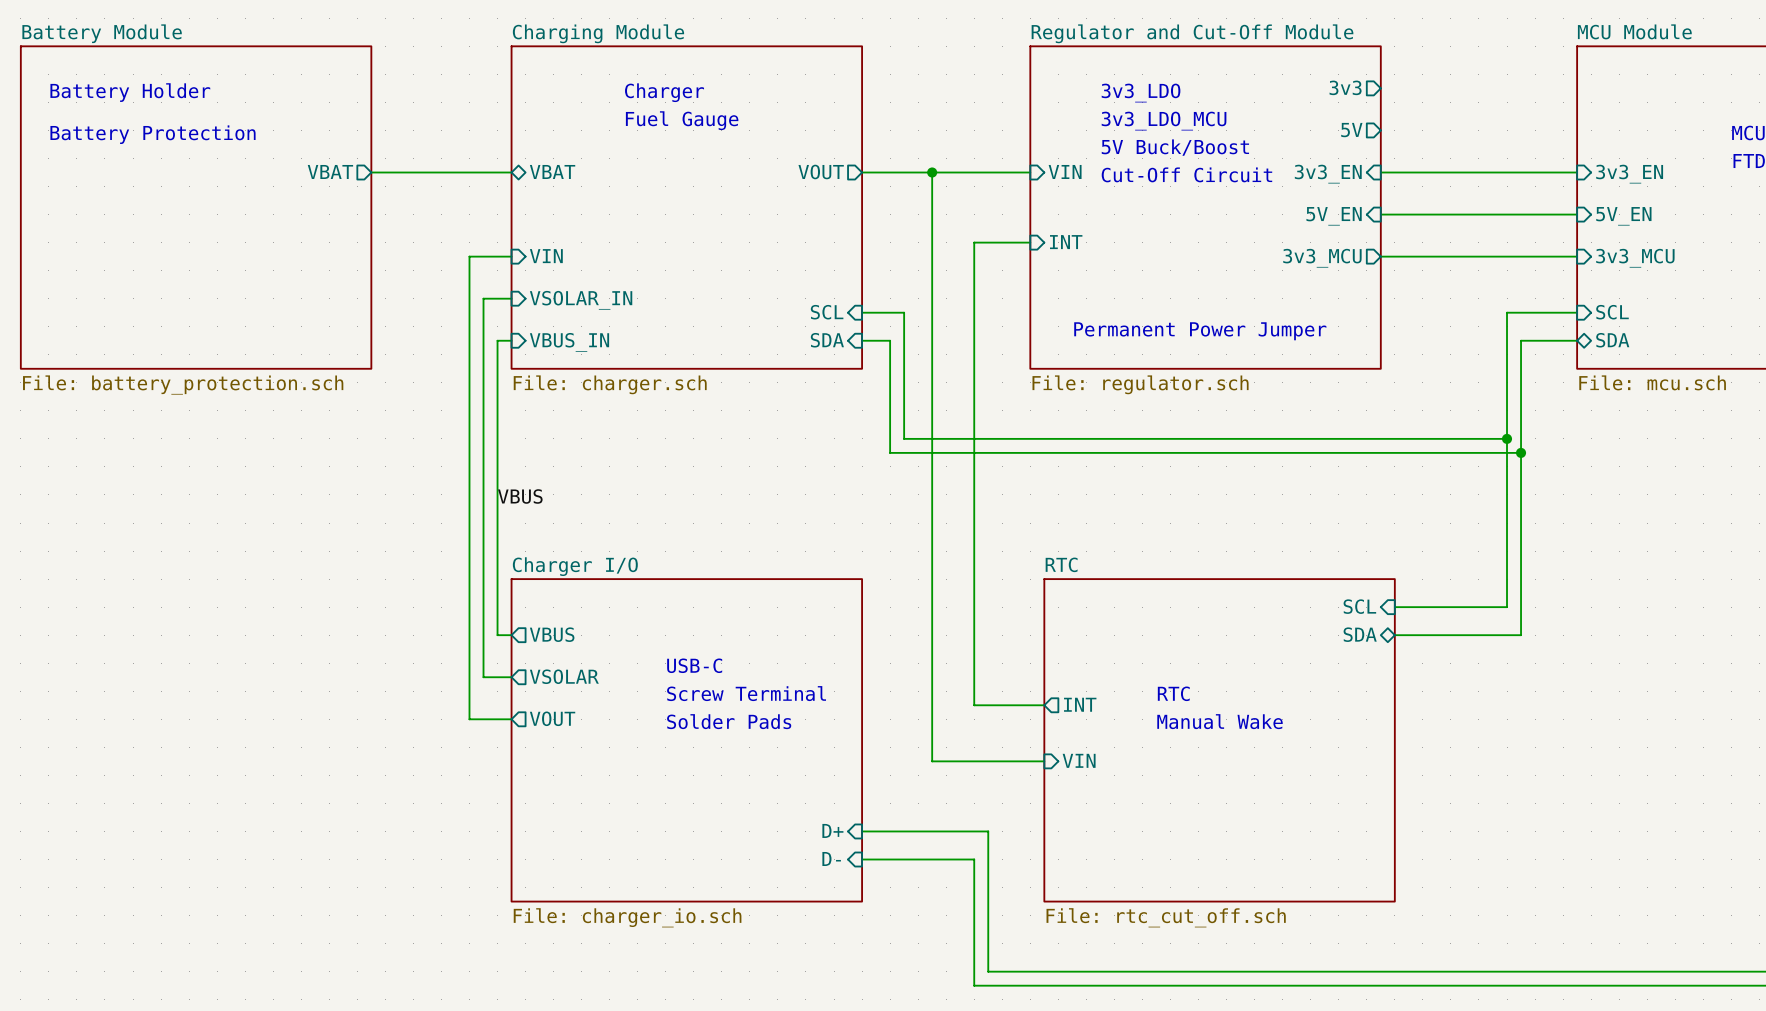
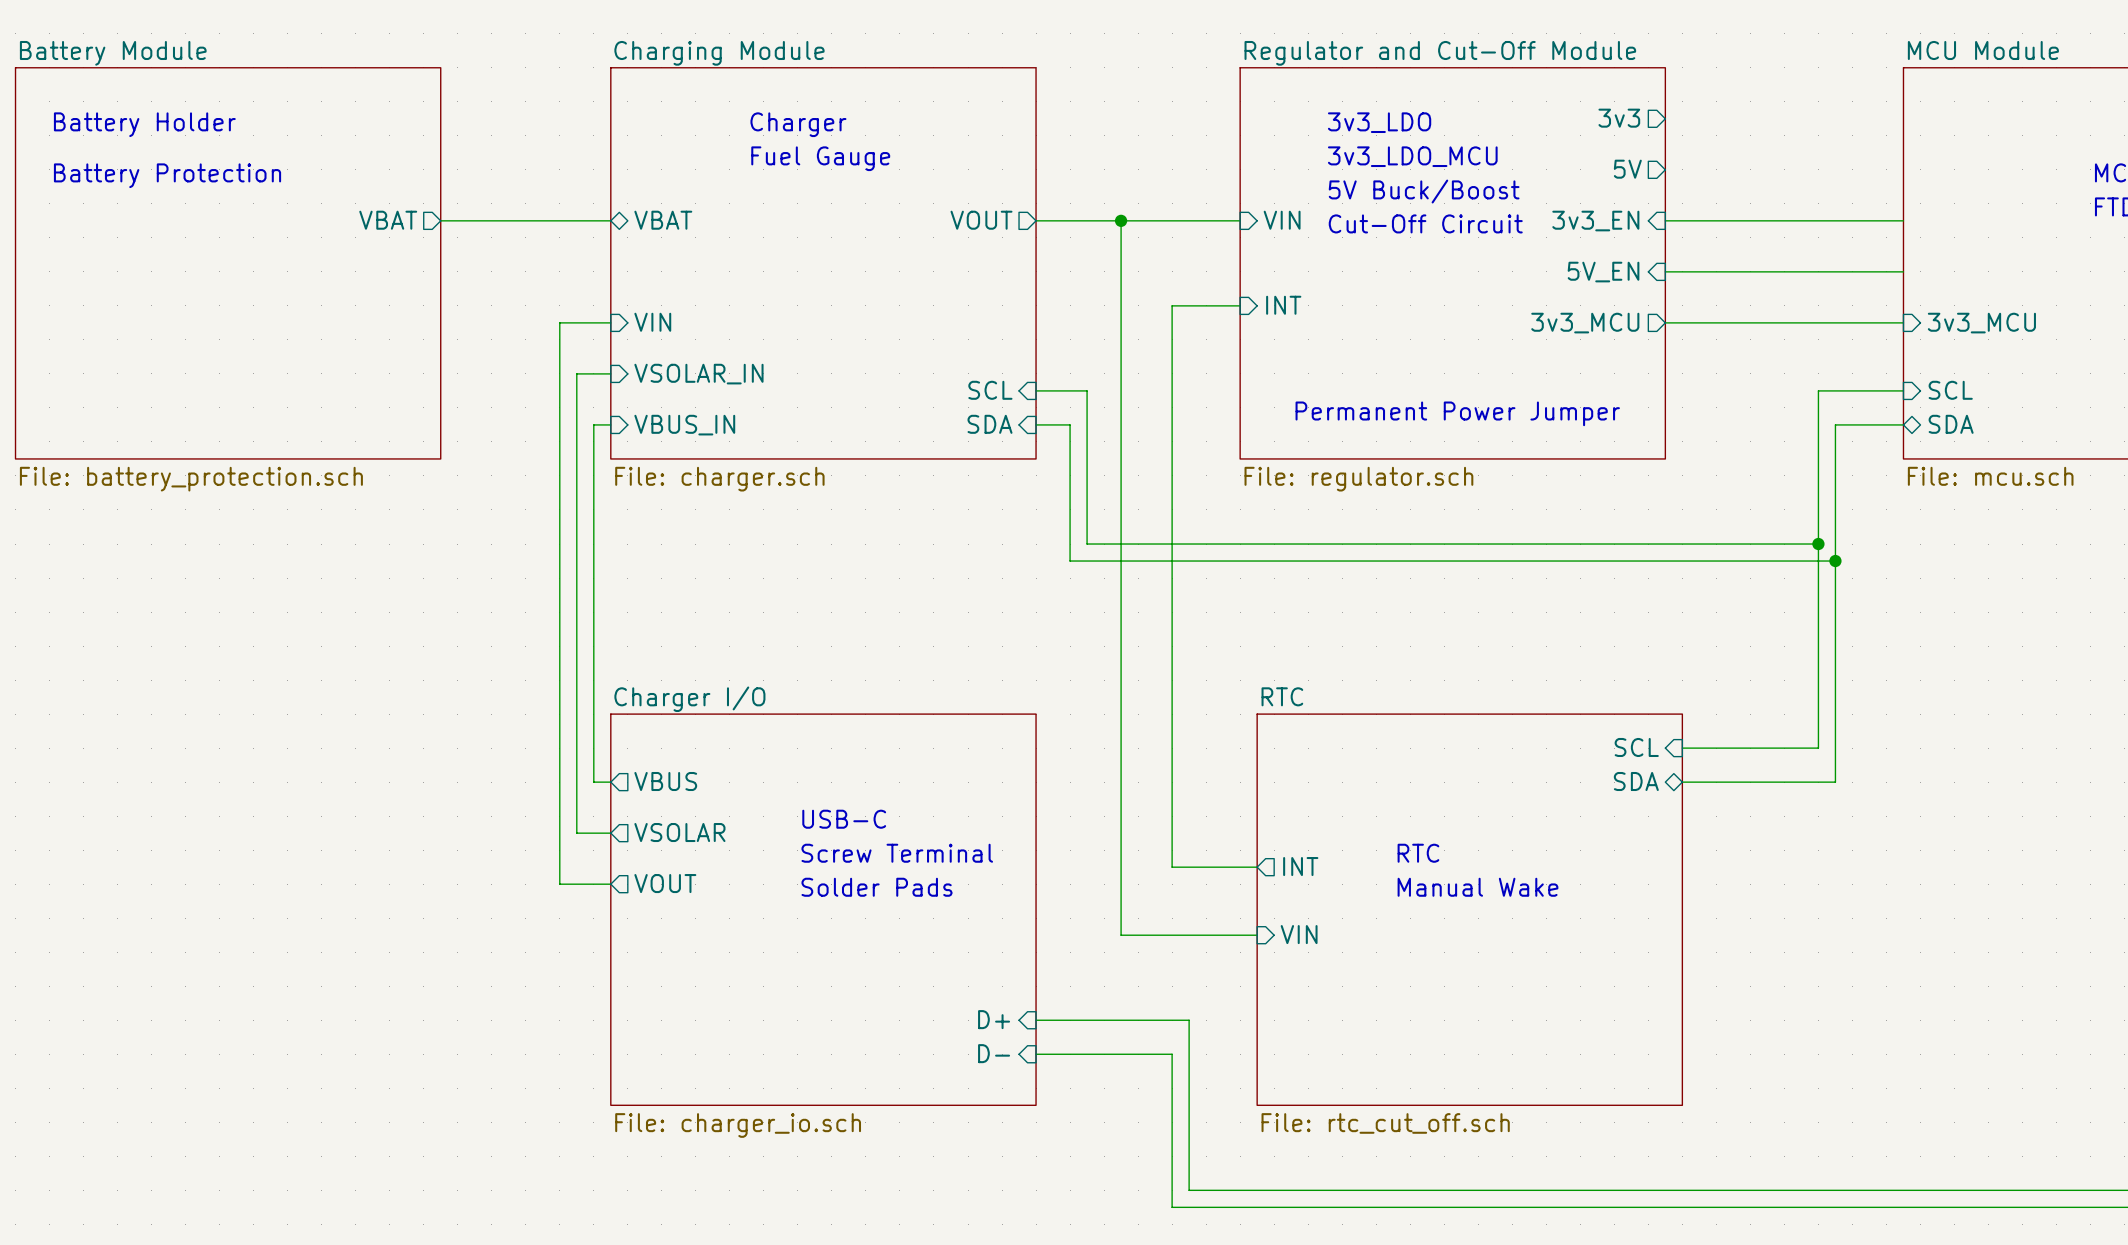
sheet pin: 3v3_EN (1629, 174) -> none
sheet pin: 5V_EN (1623, 216) -> none
label: VBUS (520, 496) -> none

